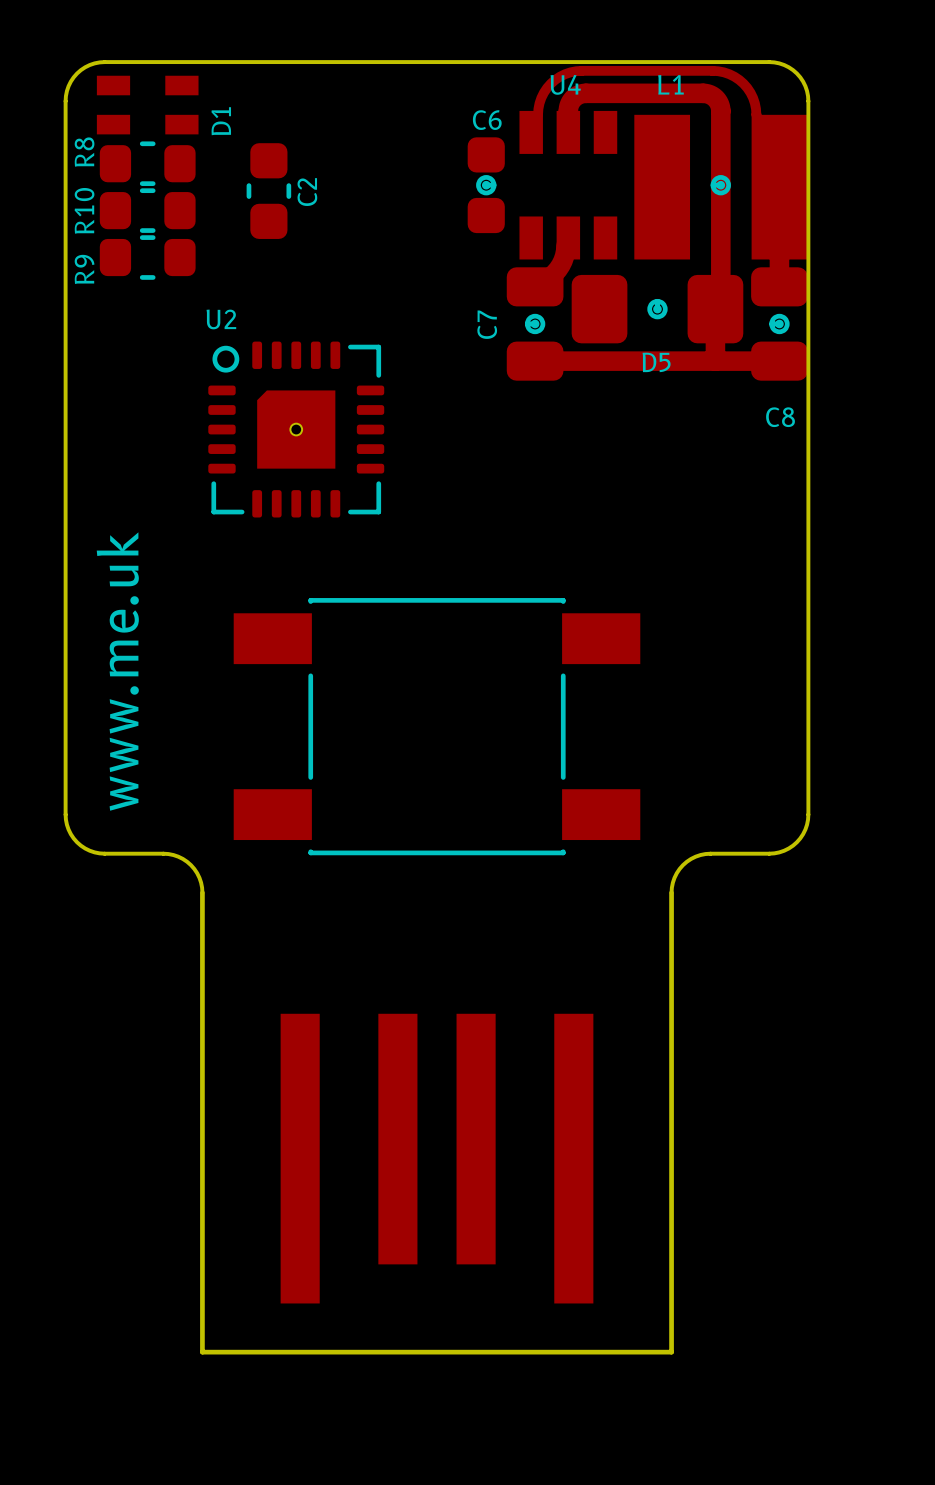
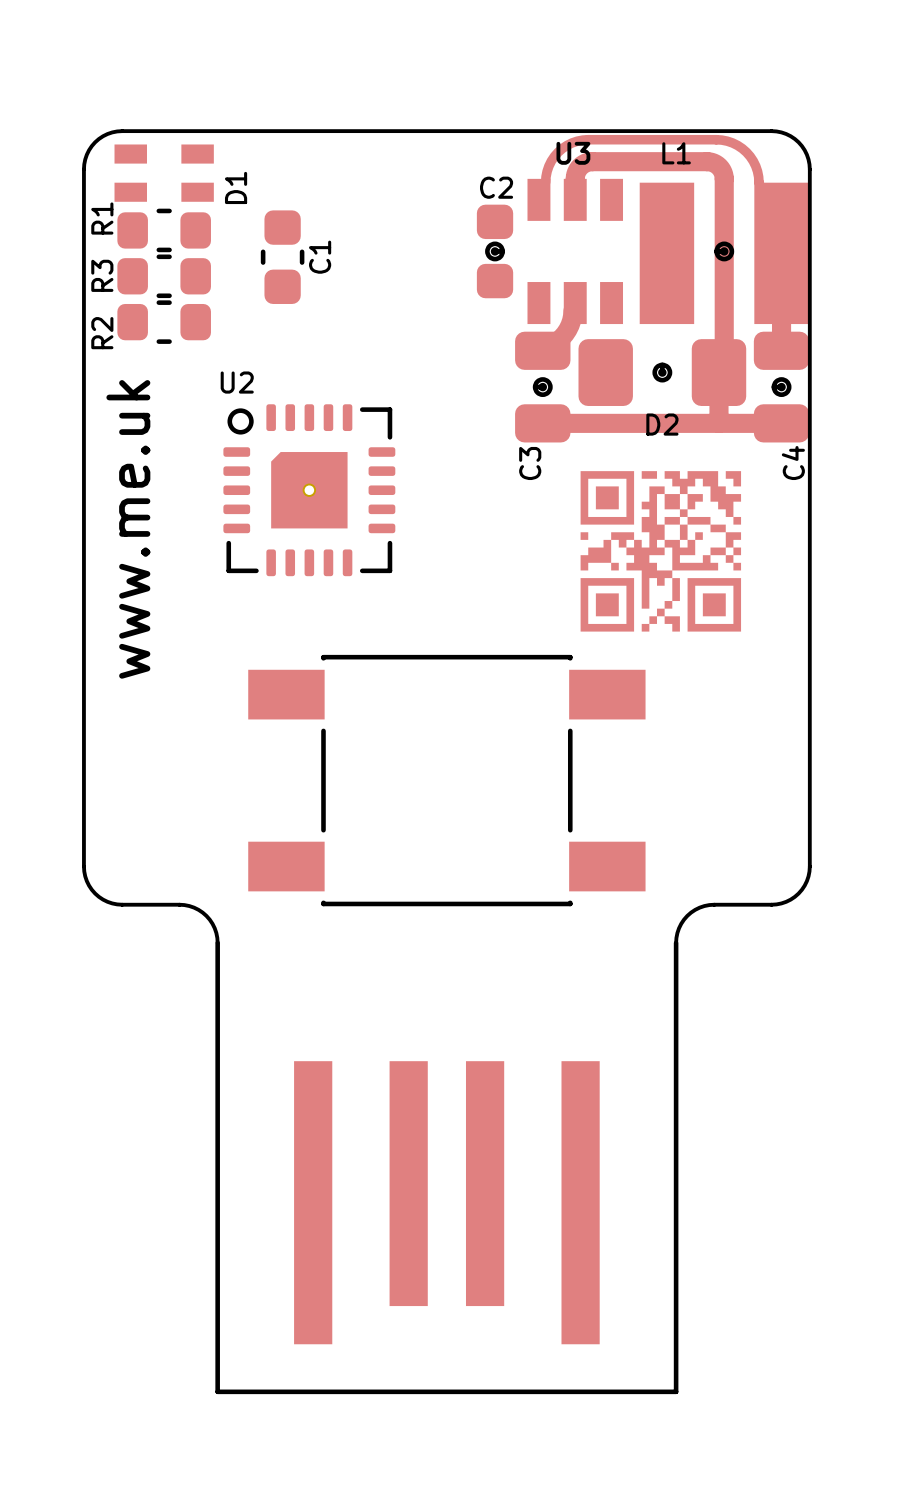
U4 name: U4 (565, 84) -> U3 (573, 153)
C6 name: C6 (487, 120) -> C2 (496, 187)
R8 name: R8 (84, 152) -> R1 (102, 218)
C2 name: C2 (307, 192) -> C1 (320, 257)
R10 name: R10 (84, 210) -> R3 (102, 275)
R9 name: R9 (84, 269) -> R2 (102, 333)
C7 name: C7 (487, 324) -> C3 (530, 463)
D5 name: D5 (656, 362) -> D2 (662, 424)
C8 name: C8 (780, 417) -> C4 (793, 463)
part: none -> (660, 551)
text position: www.me.uk (117, 671) -> www.me.uk (128, 529)

